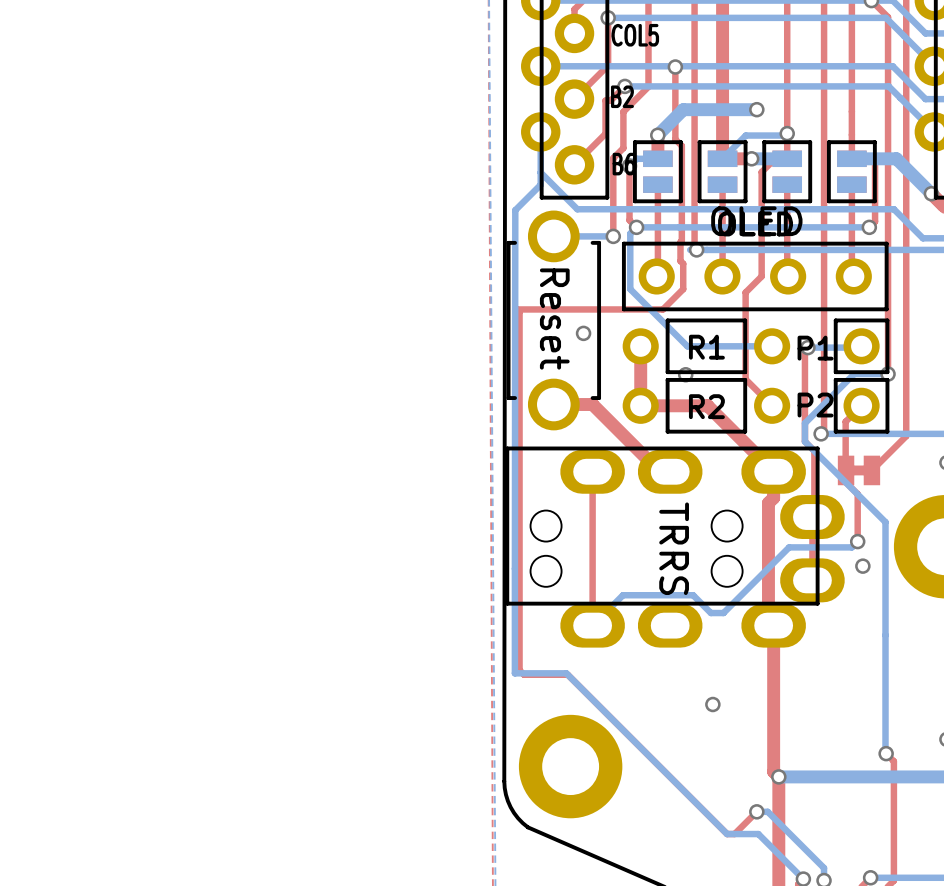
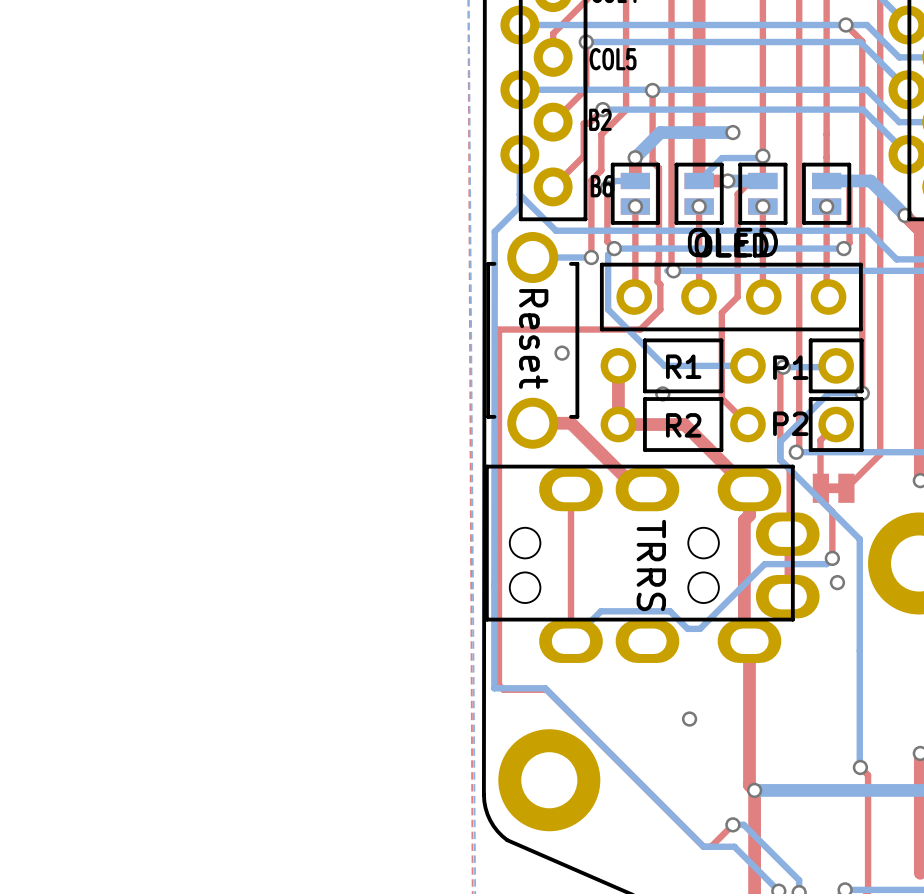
via: none -> (635, 206)
via: none -> (699, 206)
via: none -> (762, 206)
via: none -> (826, 206)

